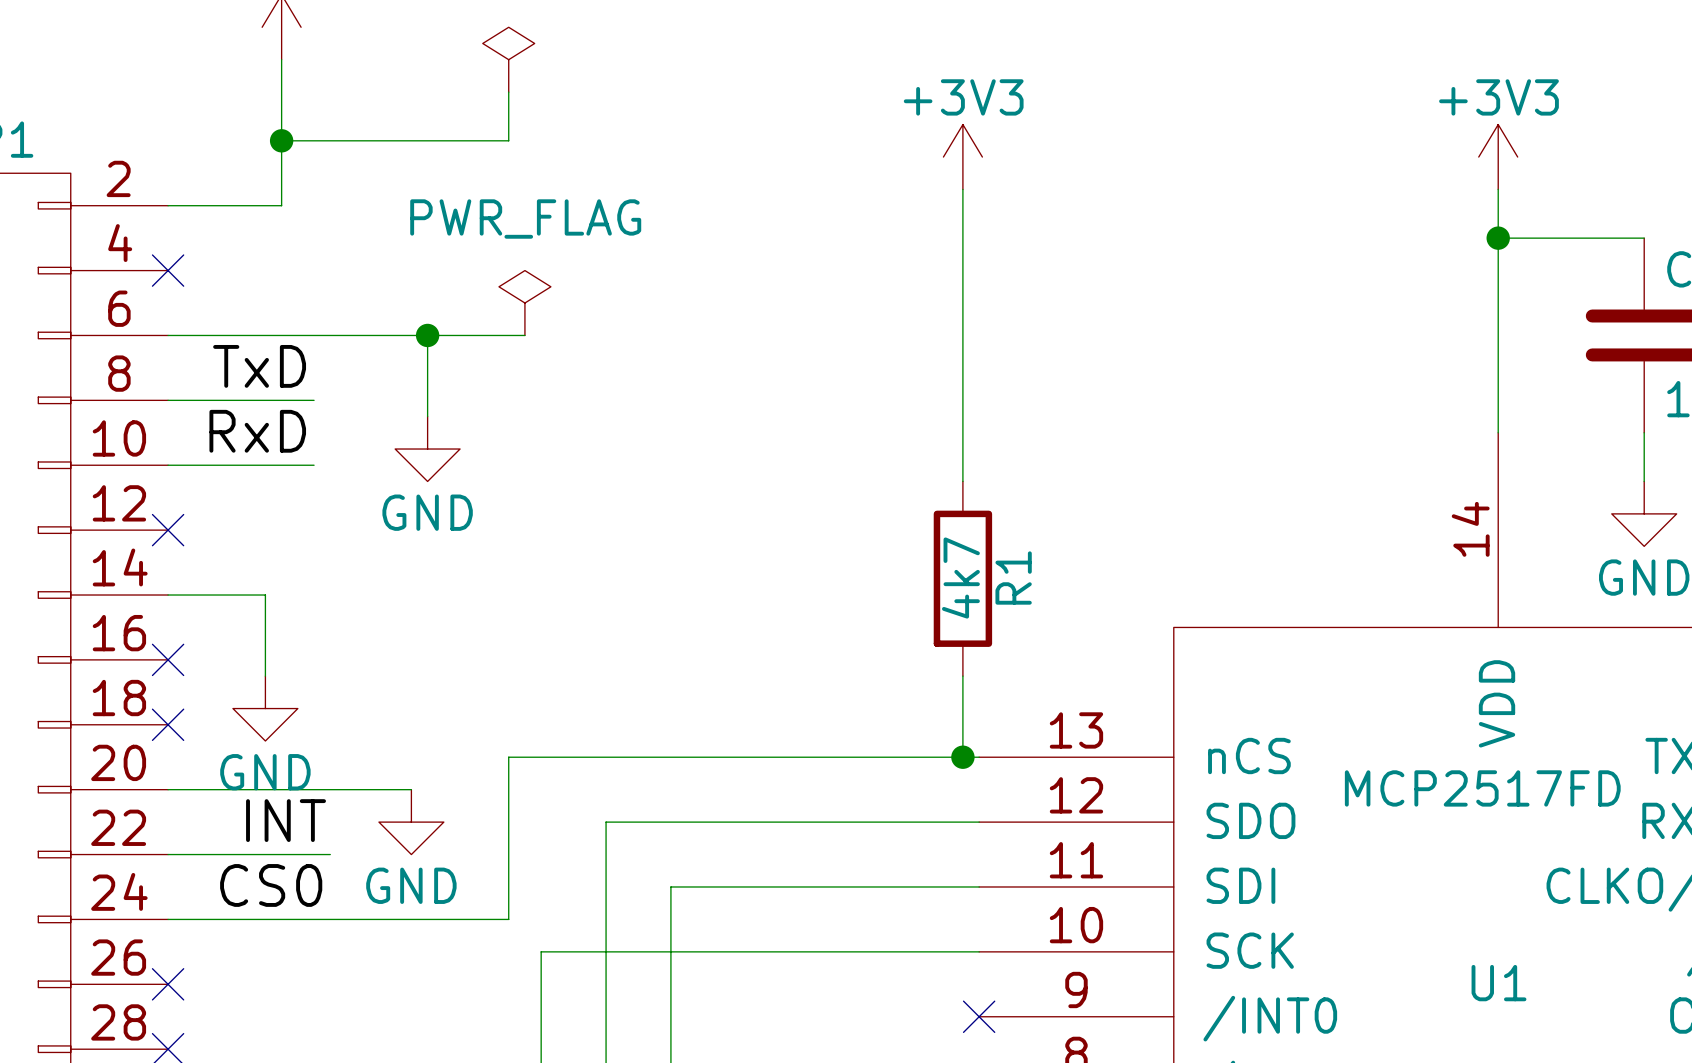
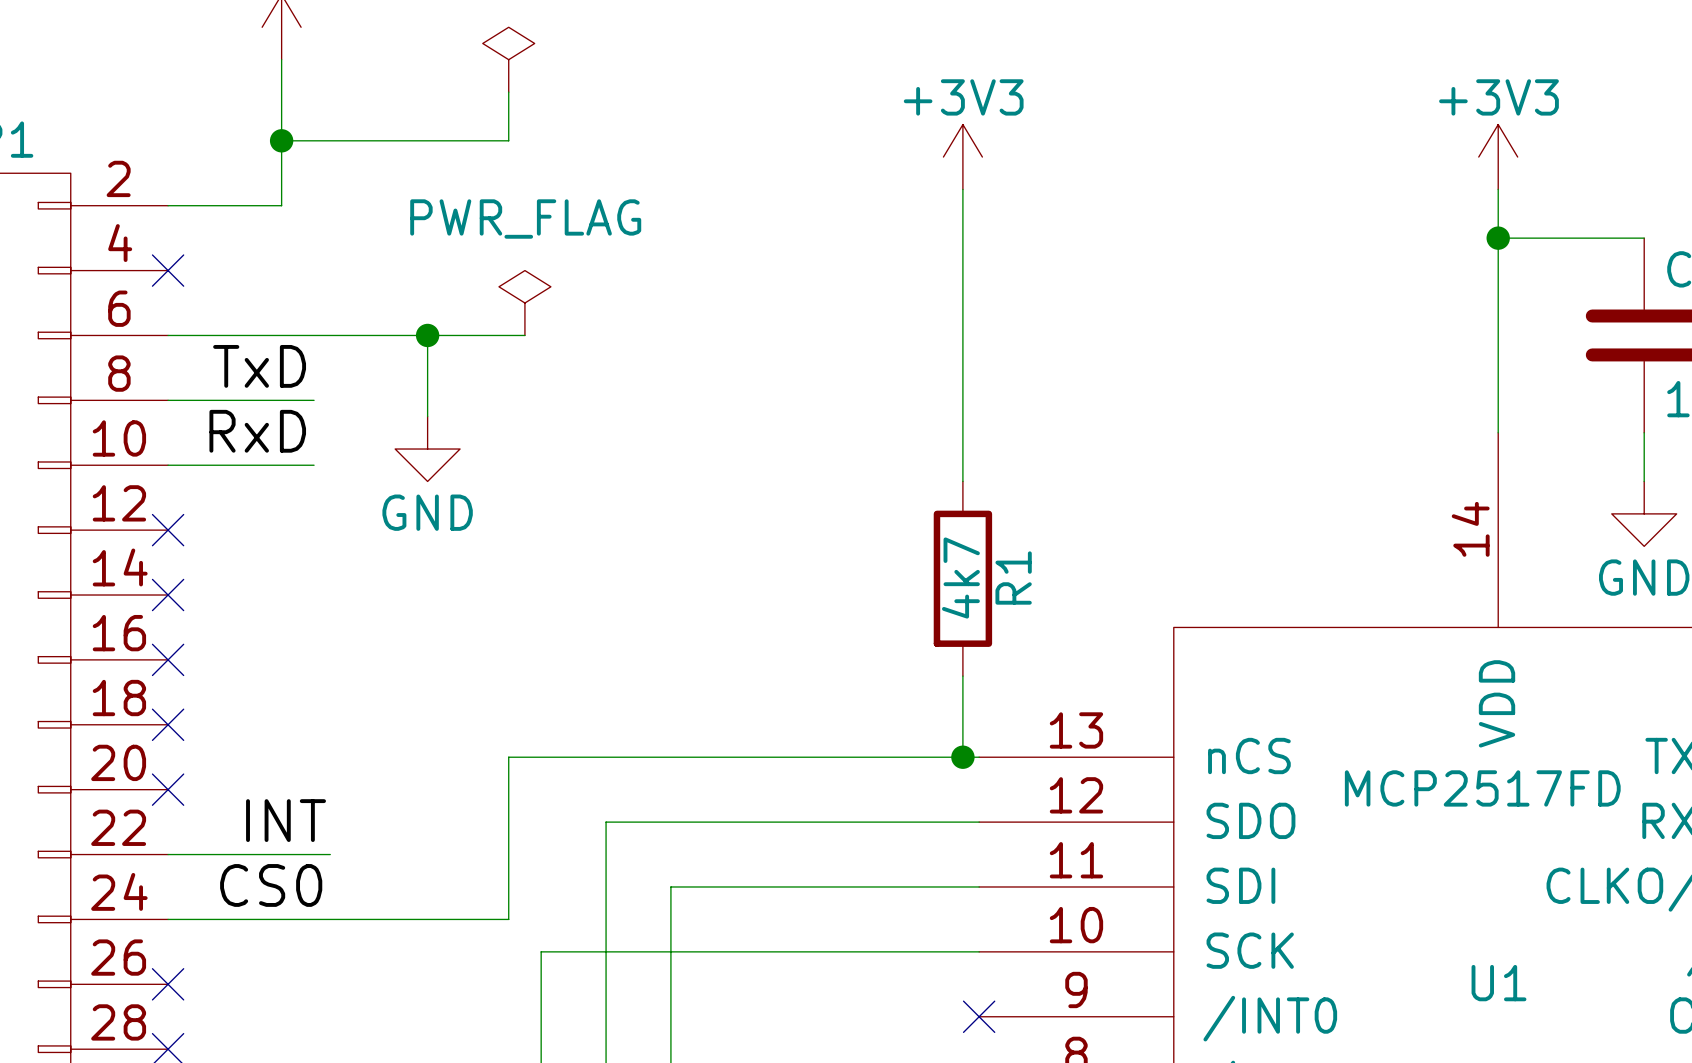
wire: (168, 595) (265, 595) (265, 676) -> none
no-connect mark: none -> (168, 595)
power symbol: GND (265, 708) -> none
wire: (168, 789) (411, 789) -> none
no-connect mark: none -> (168, 789)
power symbol: GND (411, 822) -> none

